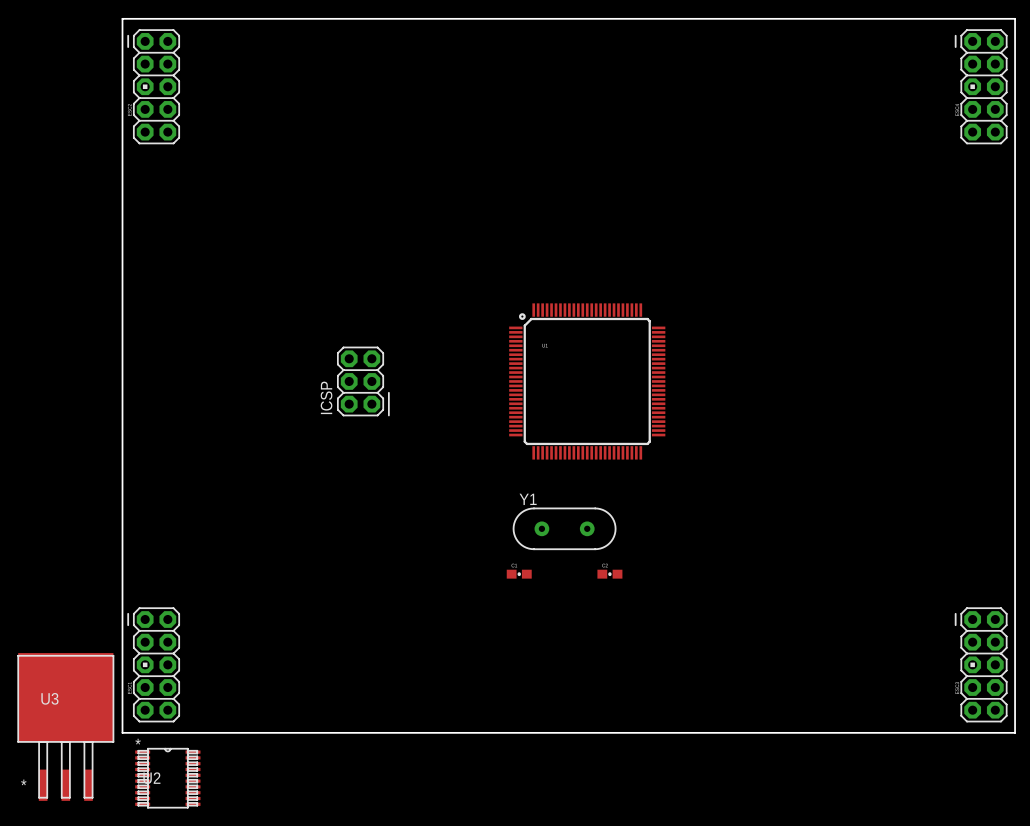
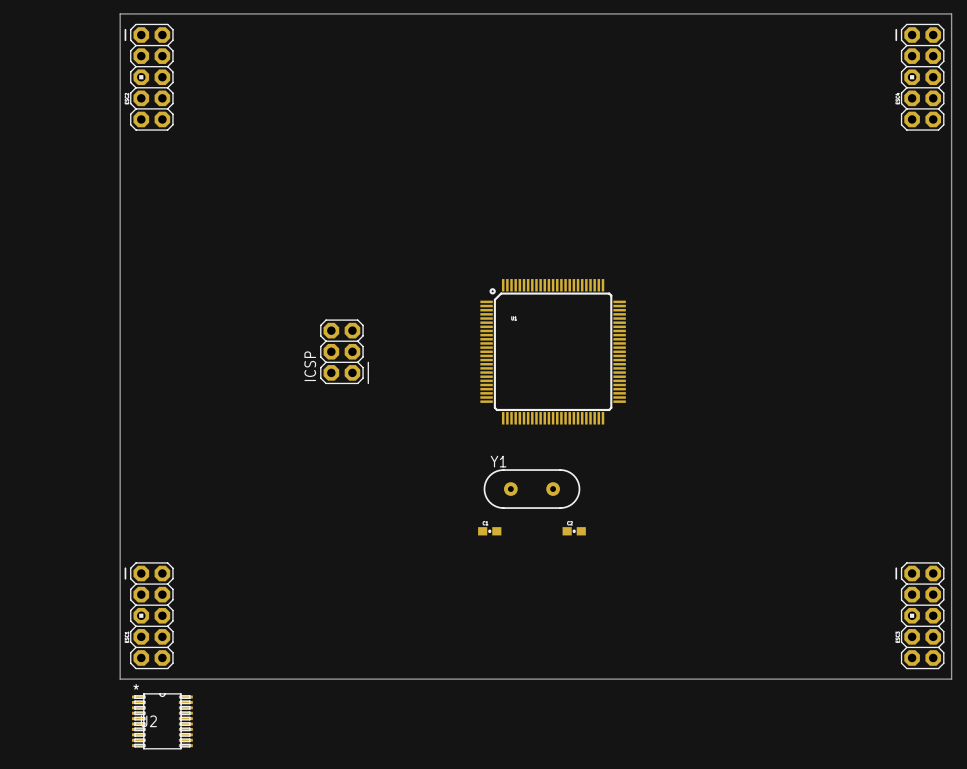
U3: (65, 726) -> none

